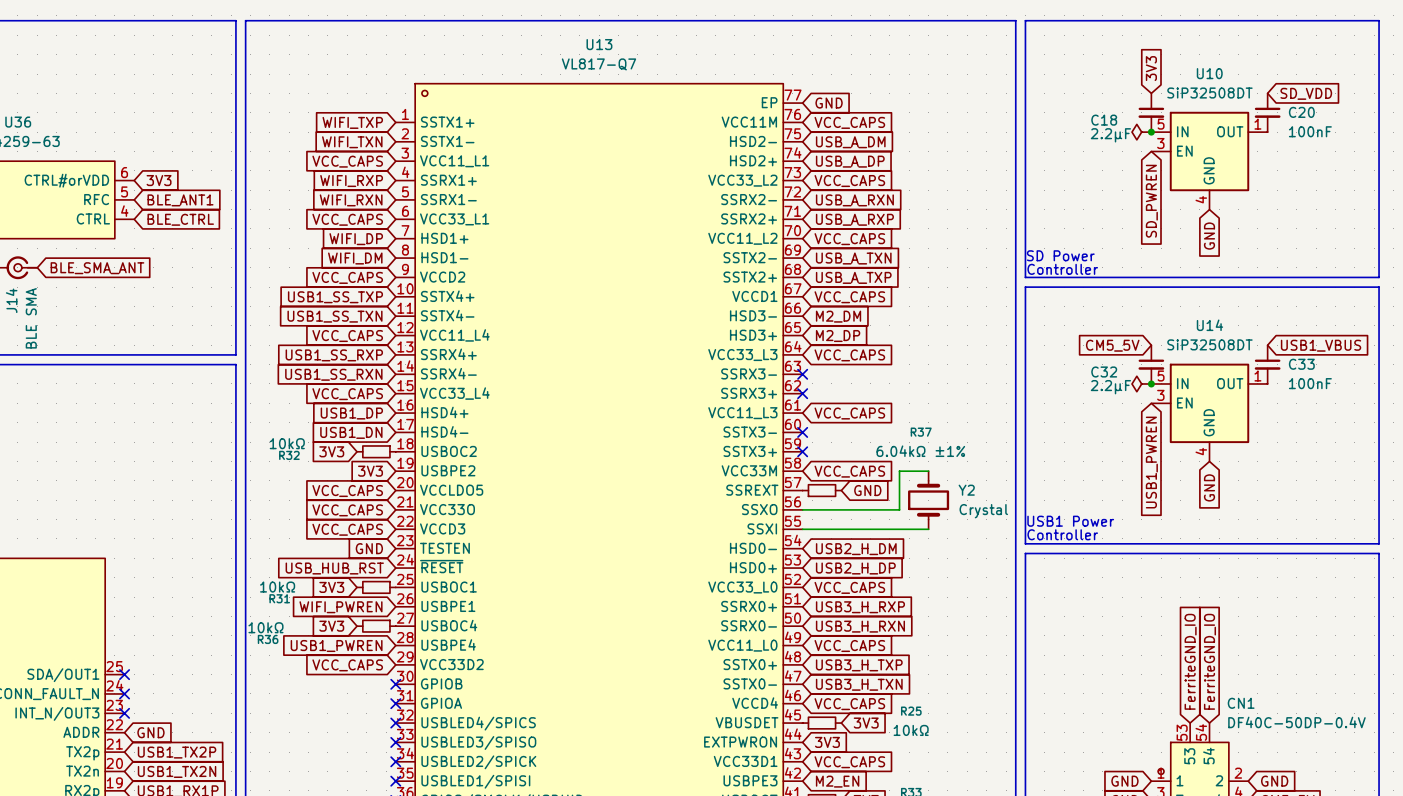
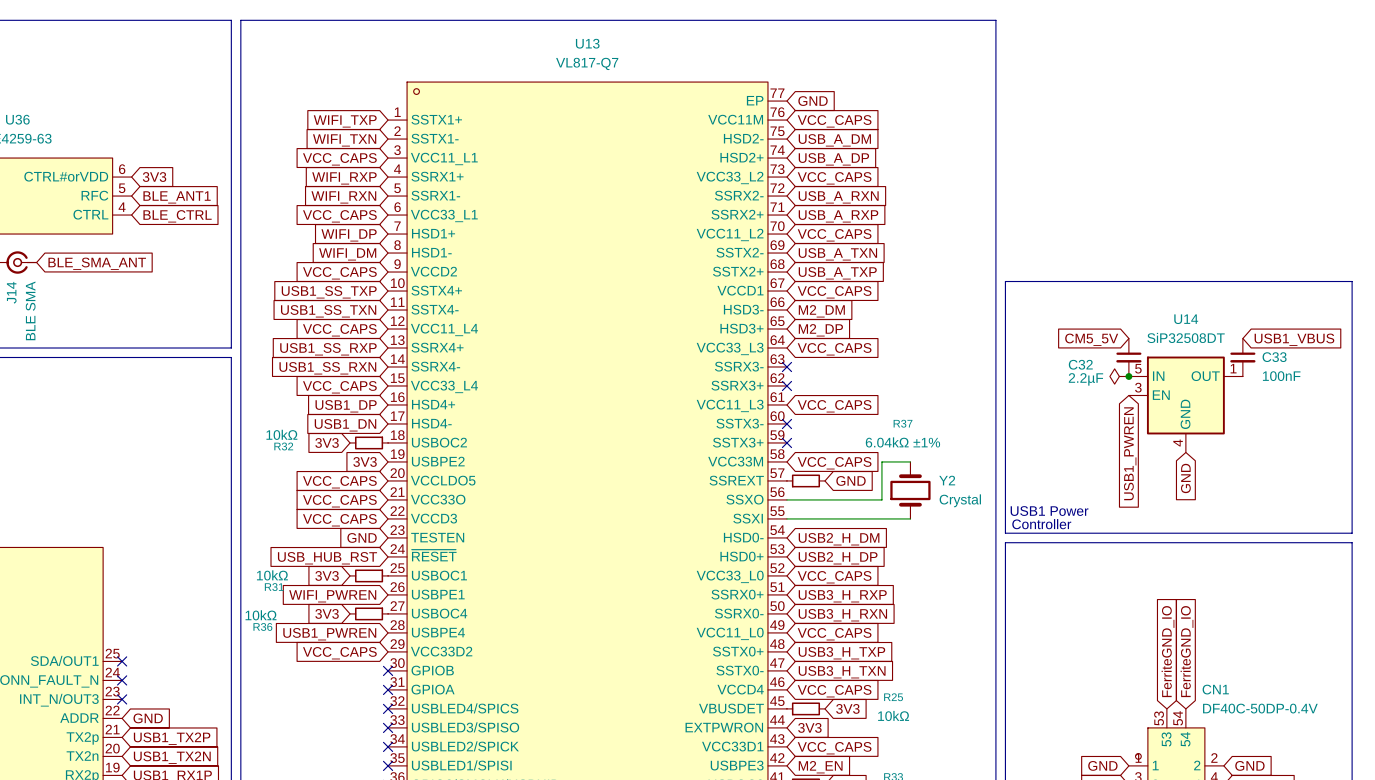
line: (1025, 20) (1379, 20) (1379, 277) (1025, 277) (1025, 20) -> none
global label: 3V3 (1151, 68) -> none
global label: SD_VDD (1306, 93) -> none
C18: 2.2µF (1151, 112) -> none
C20: 100nF (1267, 112) -> none
power symbol: (1141, 132) -> none
junction: (1151, 132) -> none
U10: SiP32508DT (1209, 160) -> none
global label: SD_PWREN (1151, 201) -> none
global label: GND (1209, 236) -> none
text: SD Power (1060, 255) -> none
text: Controller (1062, 269) -> none

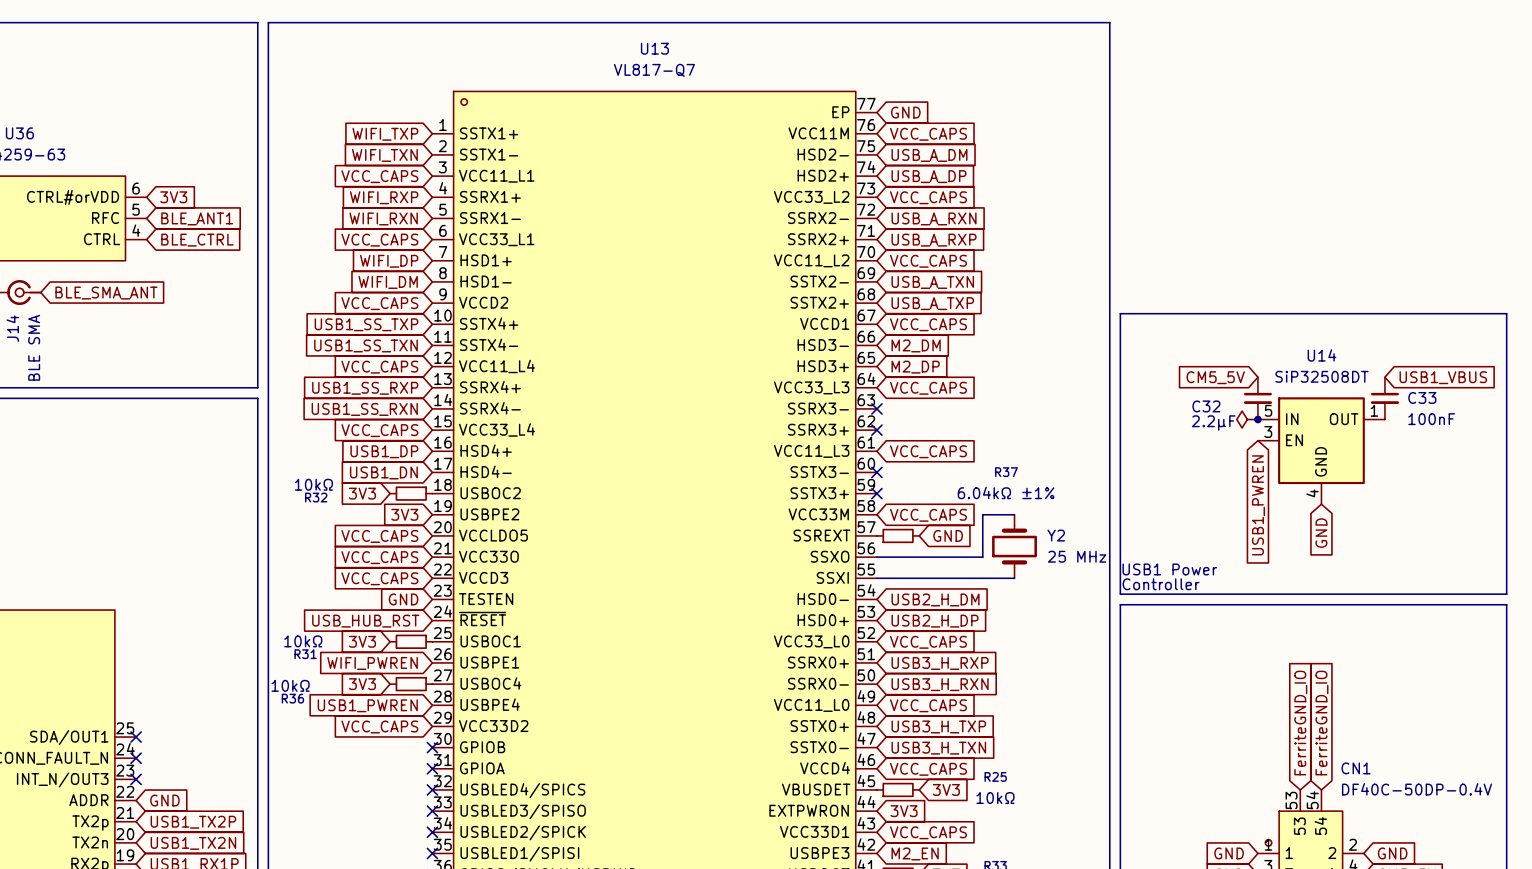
Y2 value: Crystal (960, 500) -> 25 MHz (1077, 556)

